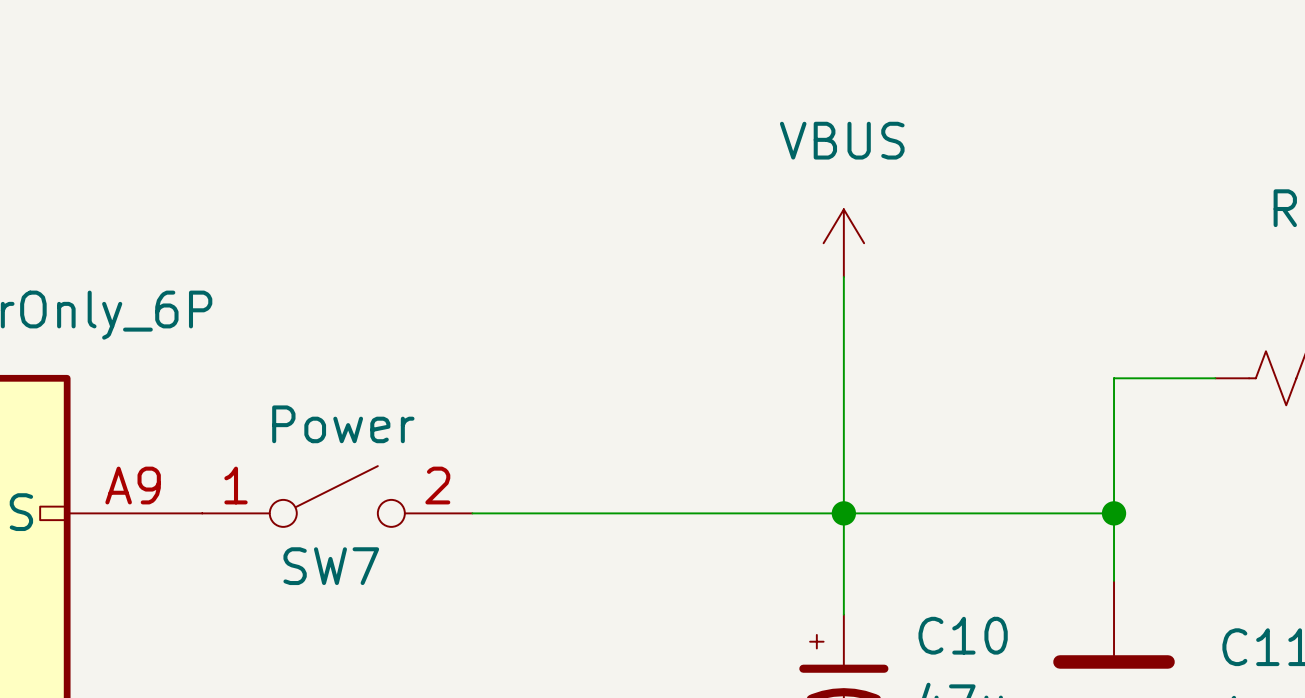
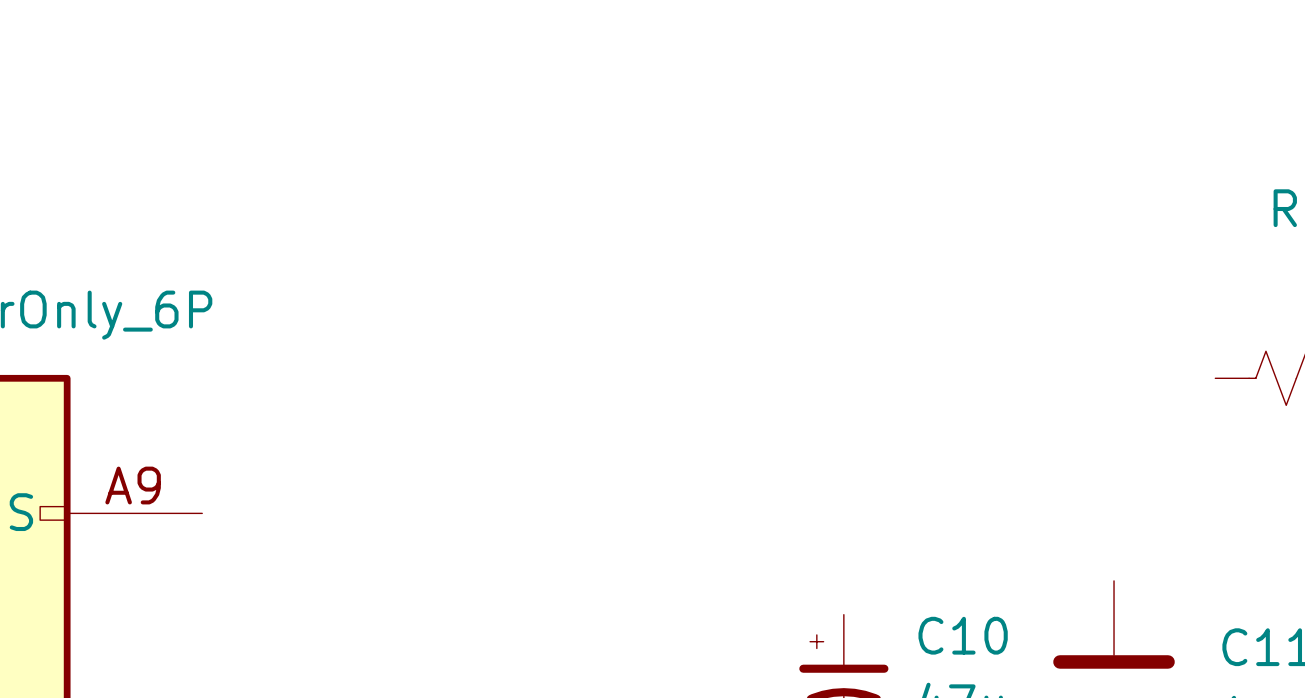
power symbol: VBUS (843, 243) -> none
wire: (843, 276) (843, 614) -> none
wire: (1215, 378) (1114, 378) (1114, 580) -> none
SW7: Power (337, 496) -> none
wire: (472, 513) (1114, 513) -> none
junction: (843, 513) -> none
junction: (1114, 513) -> none

